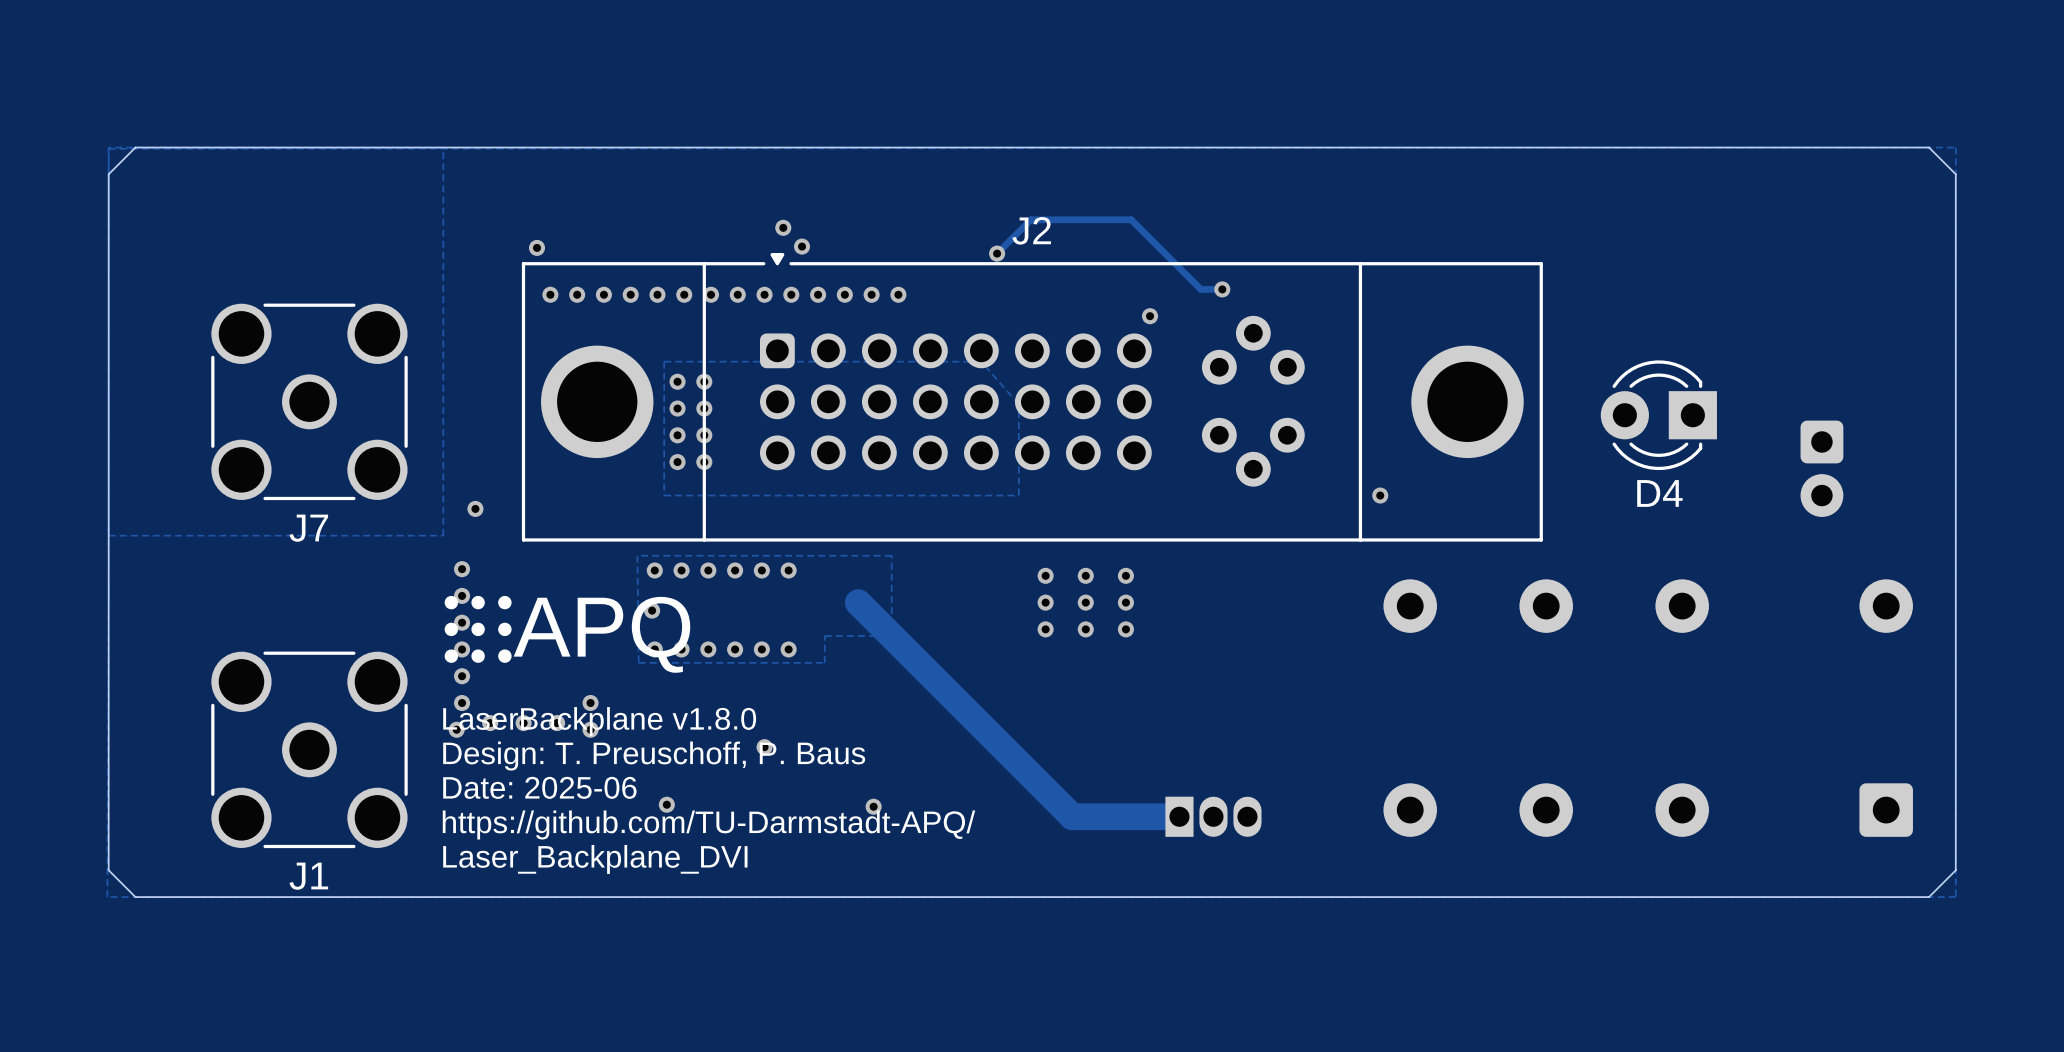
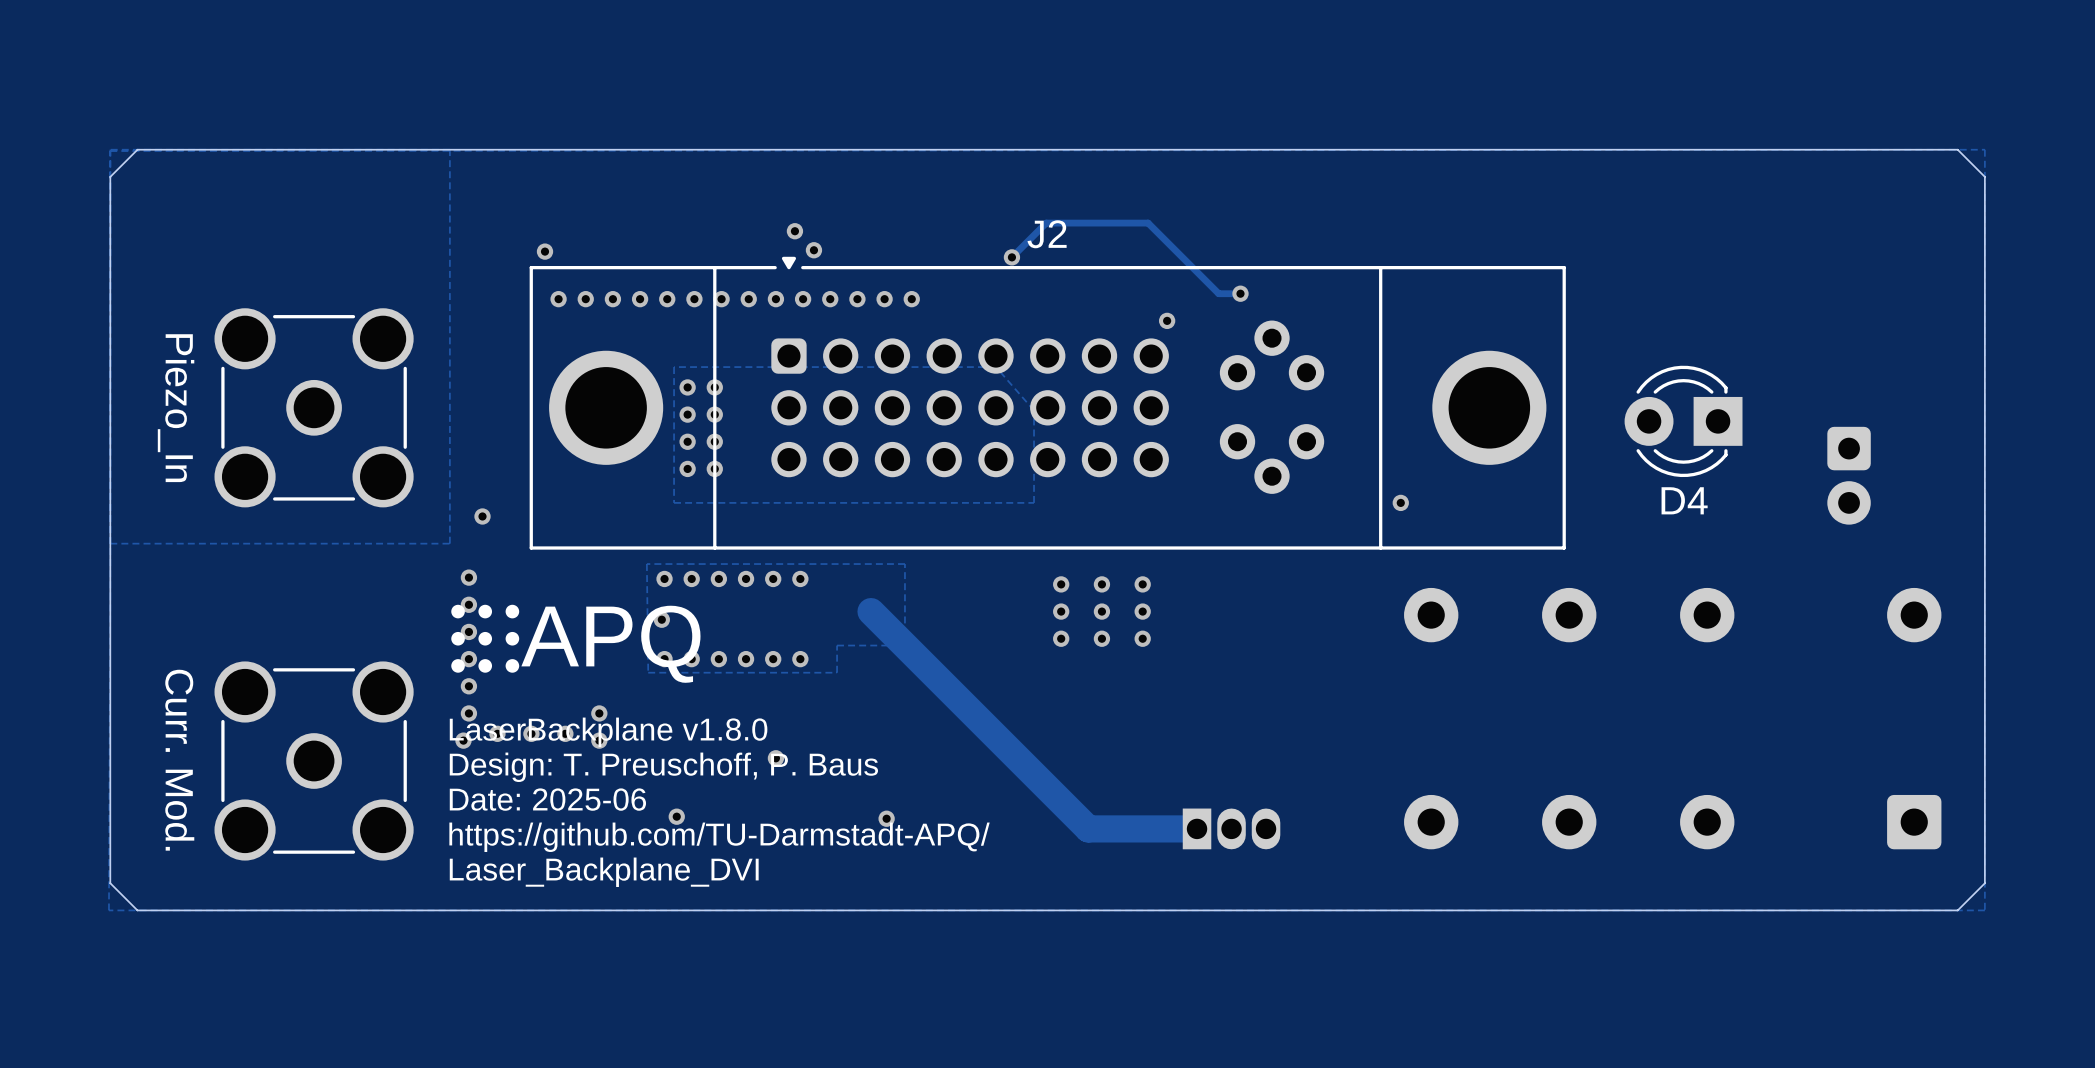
J7: (309, 401) -> none
part: none -> Piezo_In (314, 407)
J1: (309, 749) -> none
part: none -> Curr. Mod. (314, 761)

